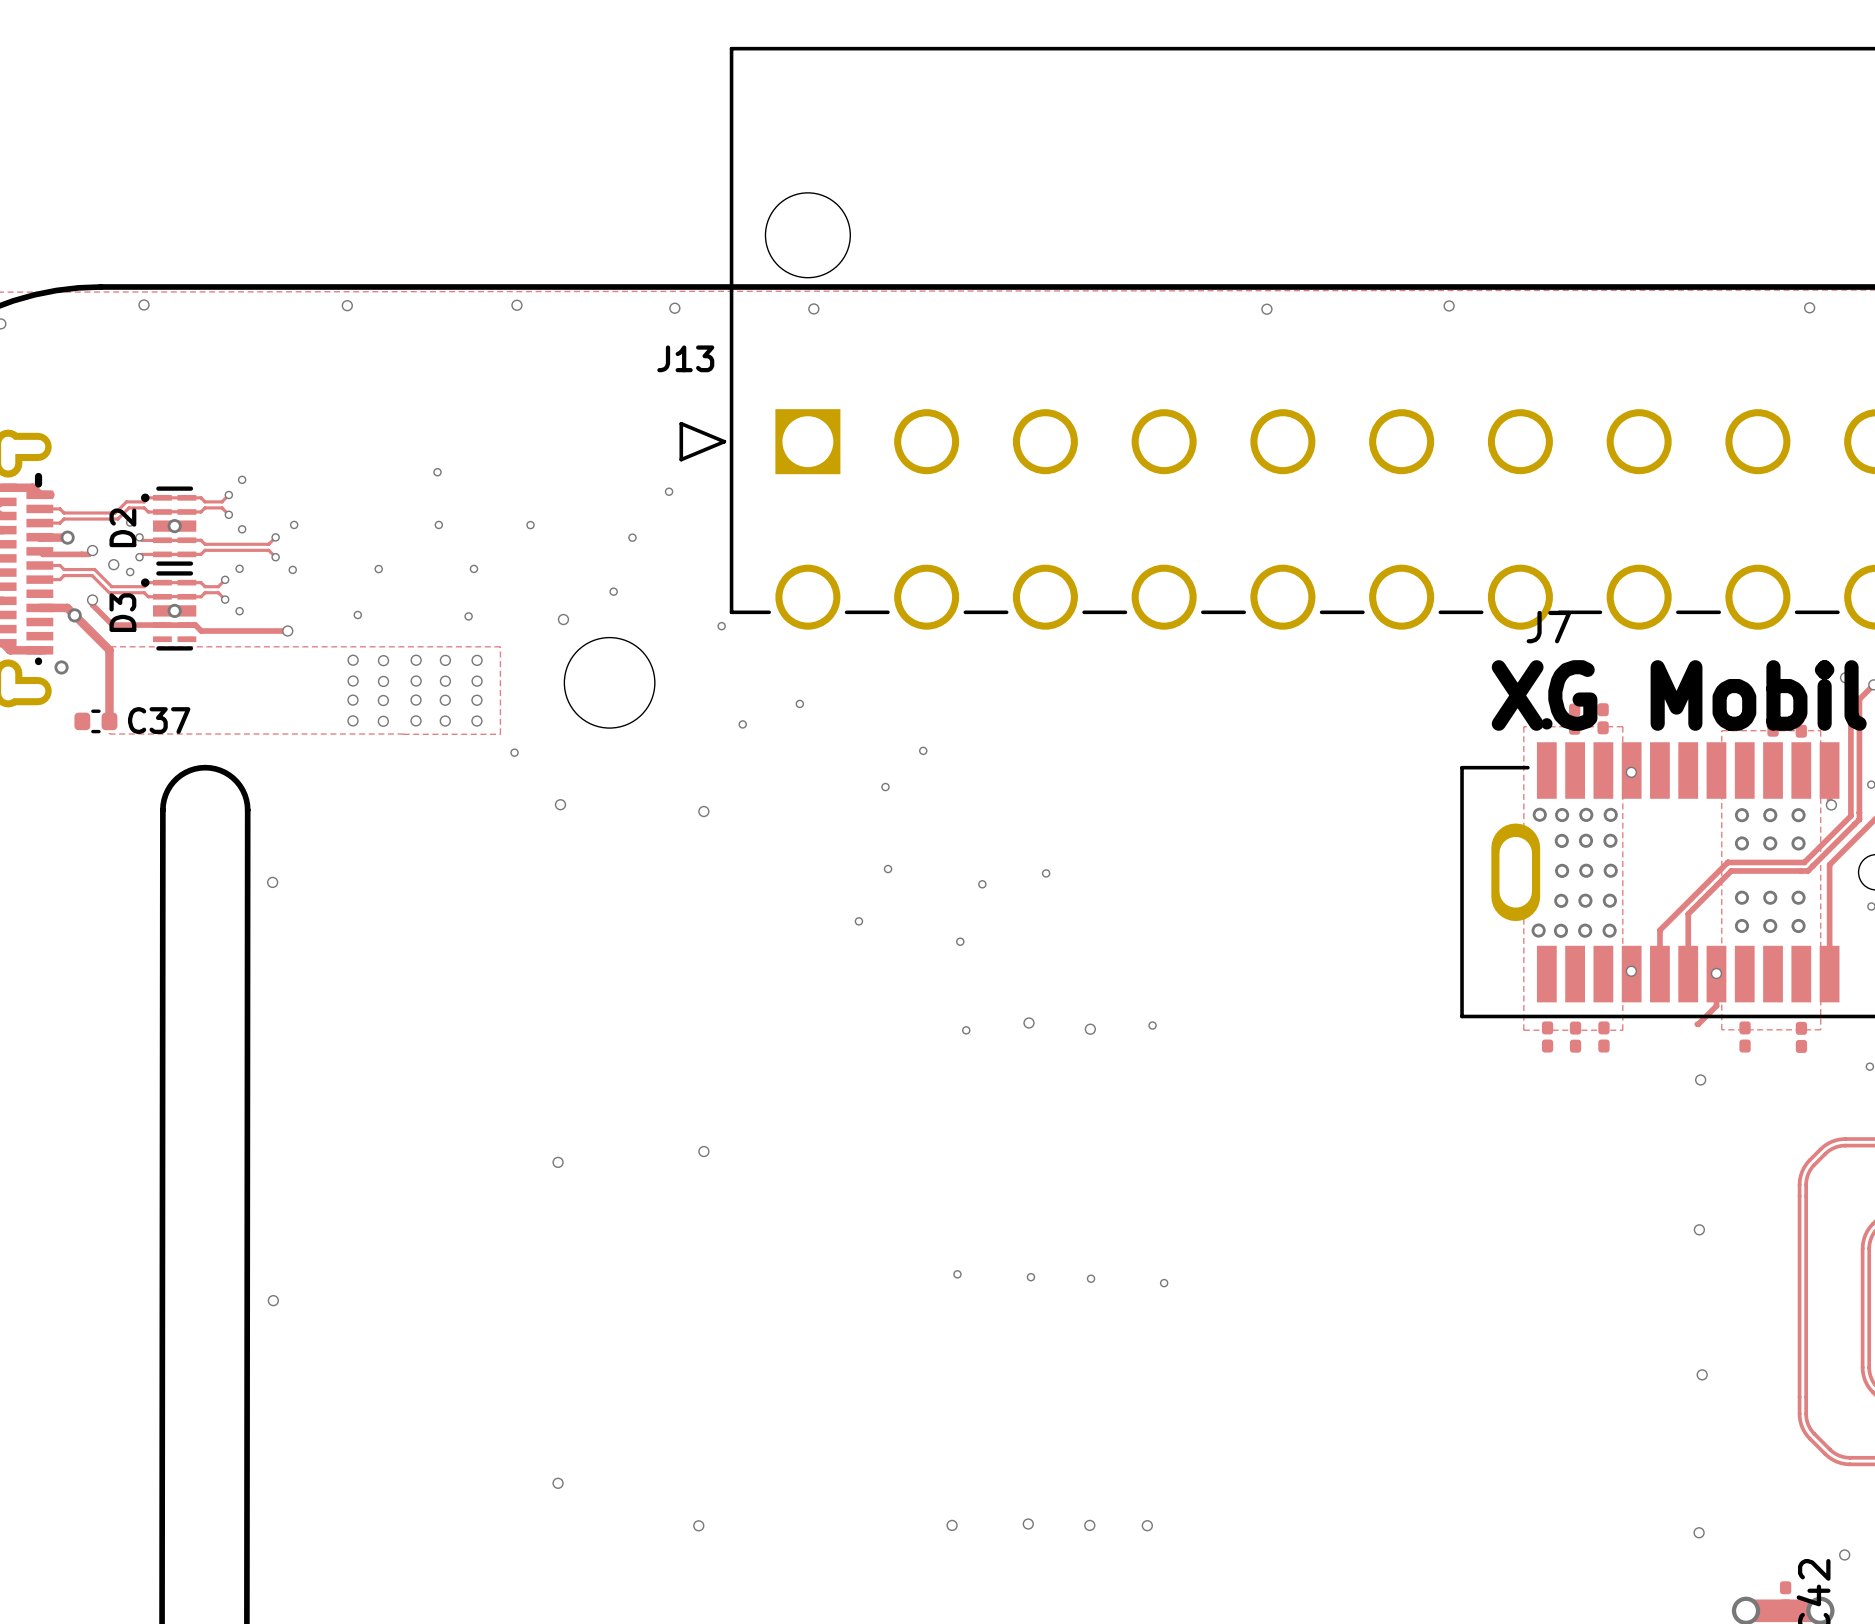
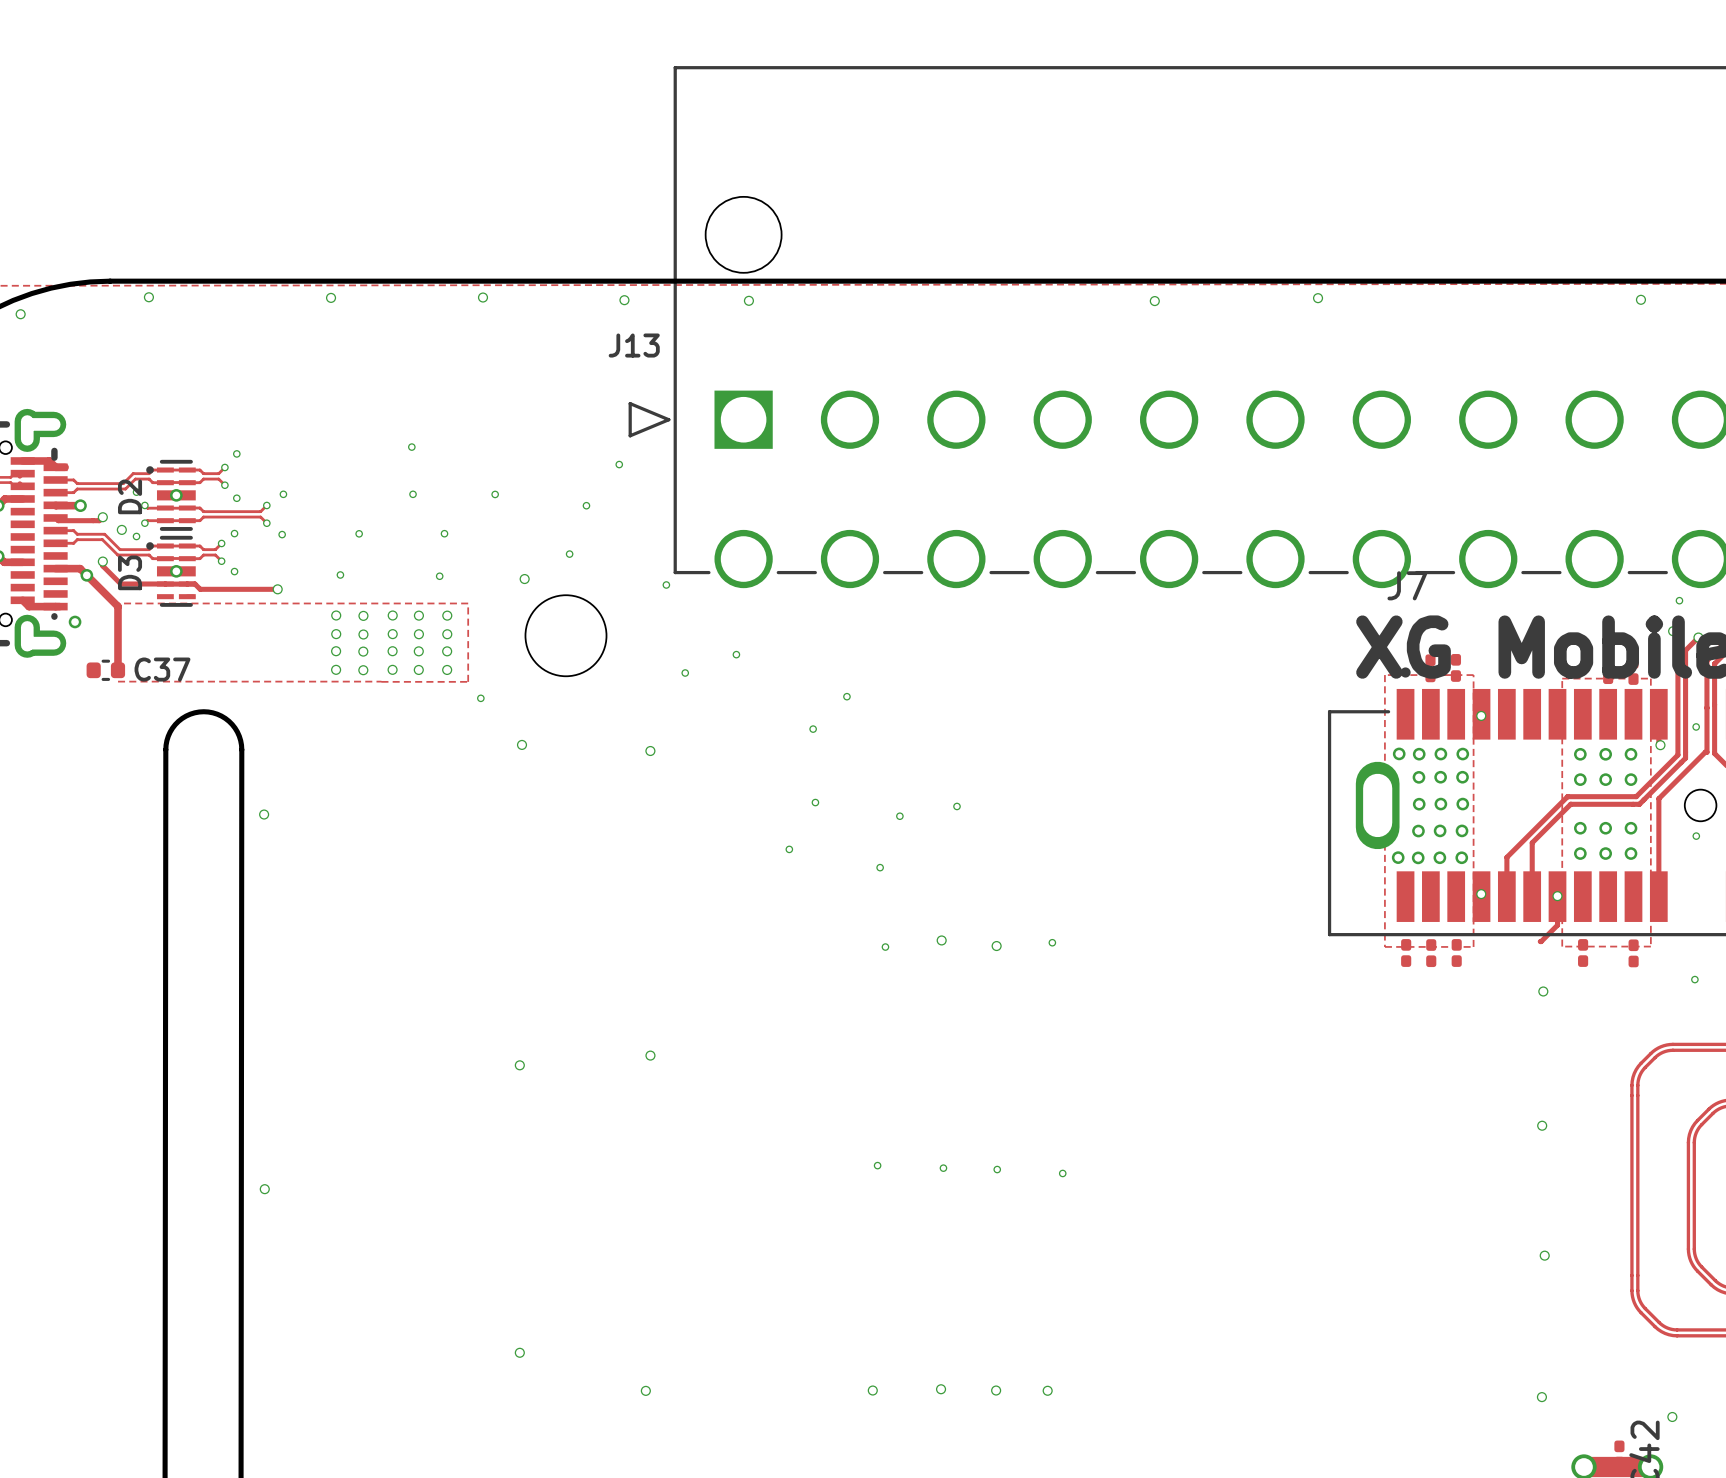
via: none -> (1679, 600)

